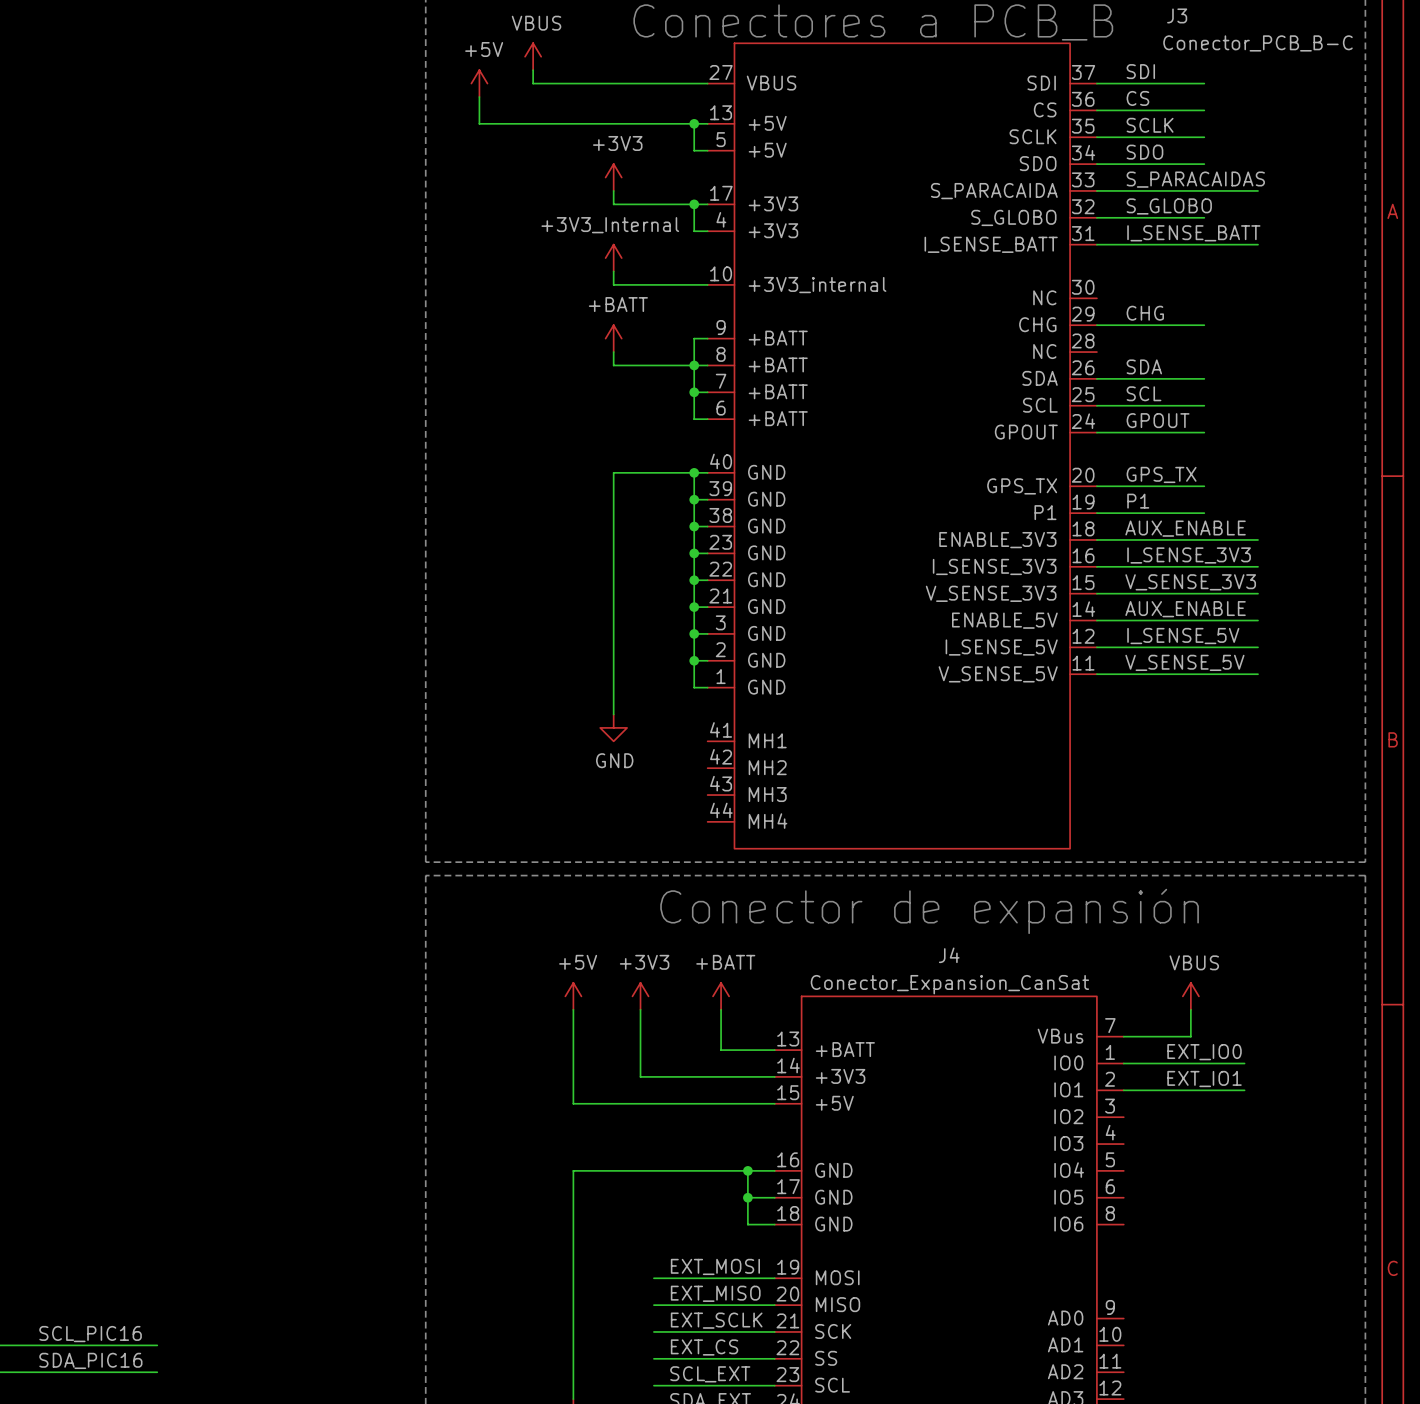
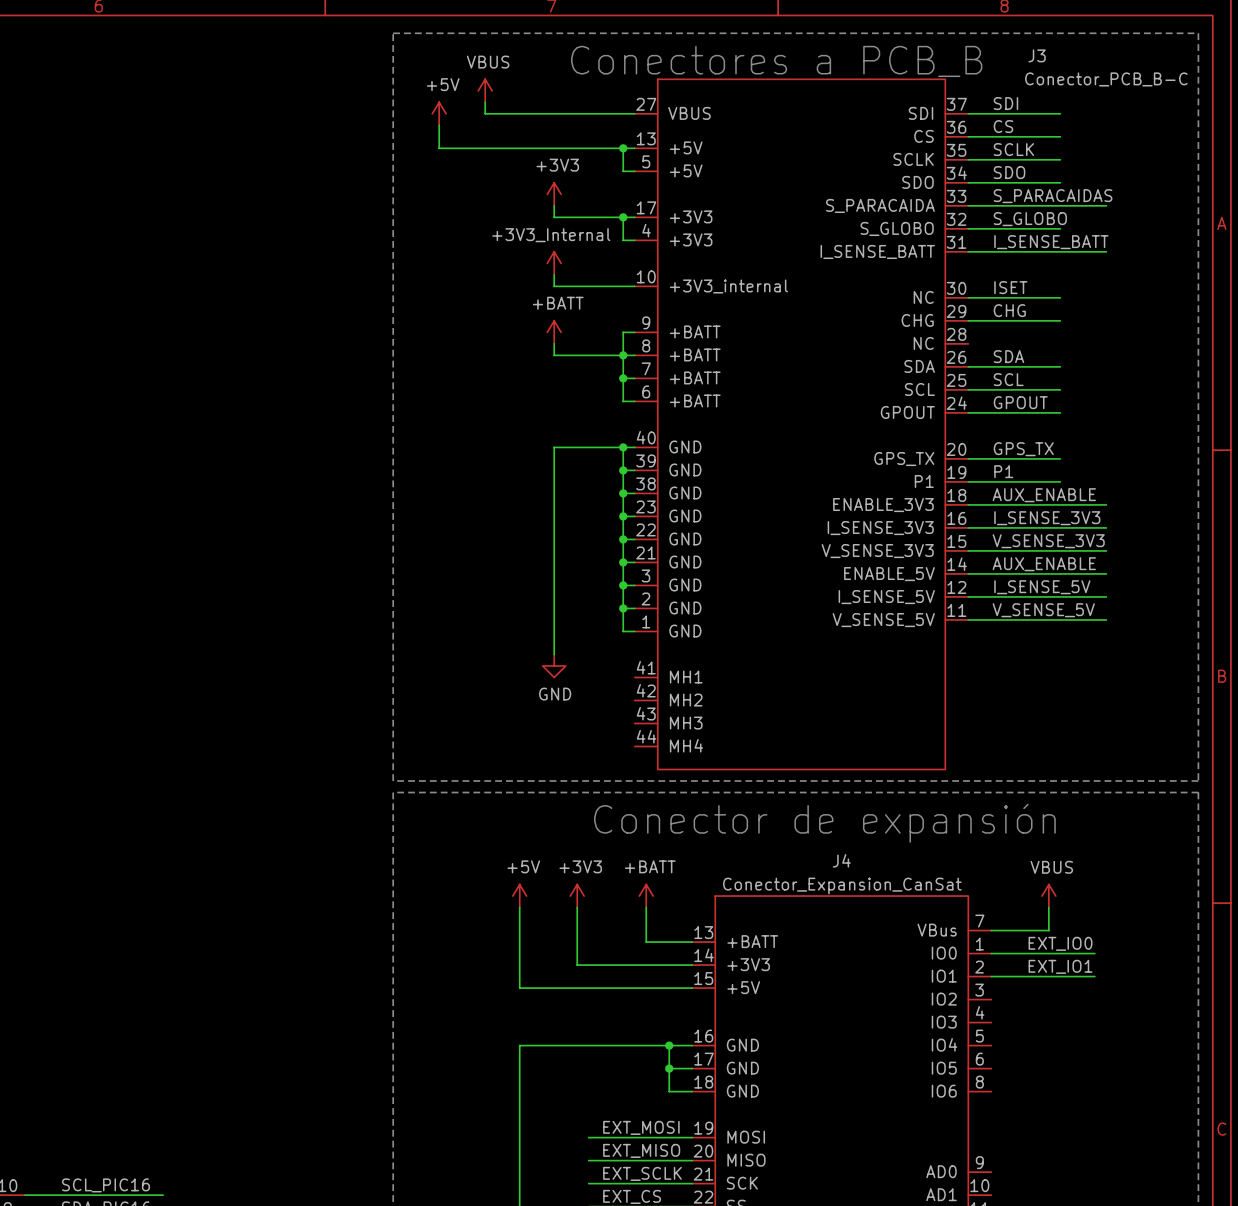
label: none -> ISET (1010, 287)
wire: none -> (968, 297) (1060, 297)

